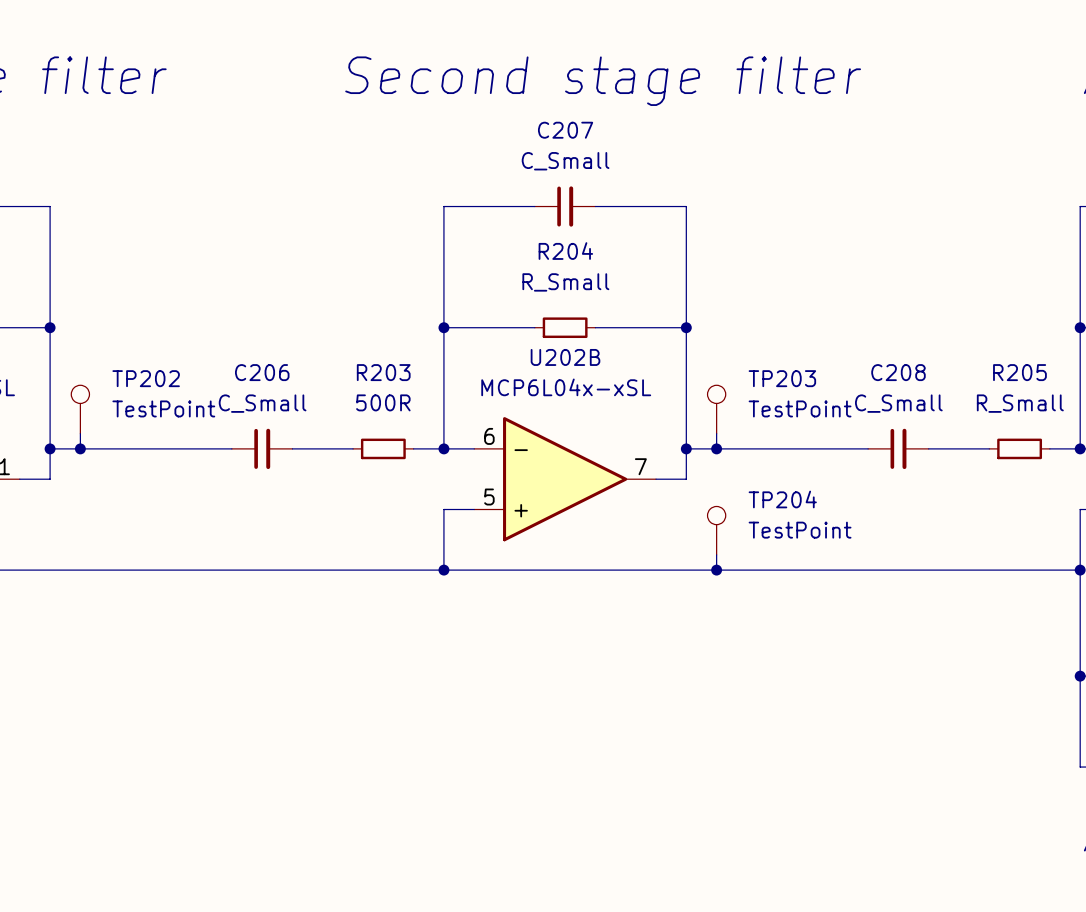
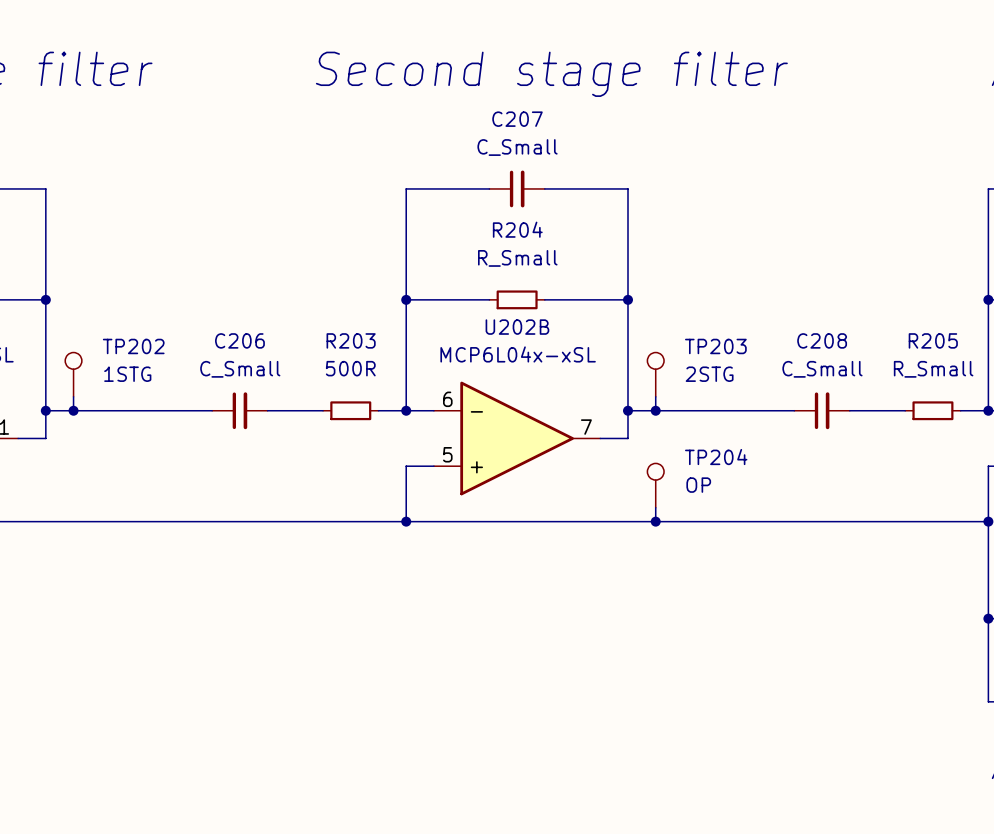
TP202 value: TestPoint (163, 408) -> 1STG (127, 374)
TP203 value: TestPoint (800, 408) -> 2STG (709, 374)
TP204 value: TestPoint (800, 530) -> OP (698, 485)

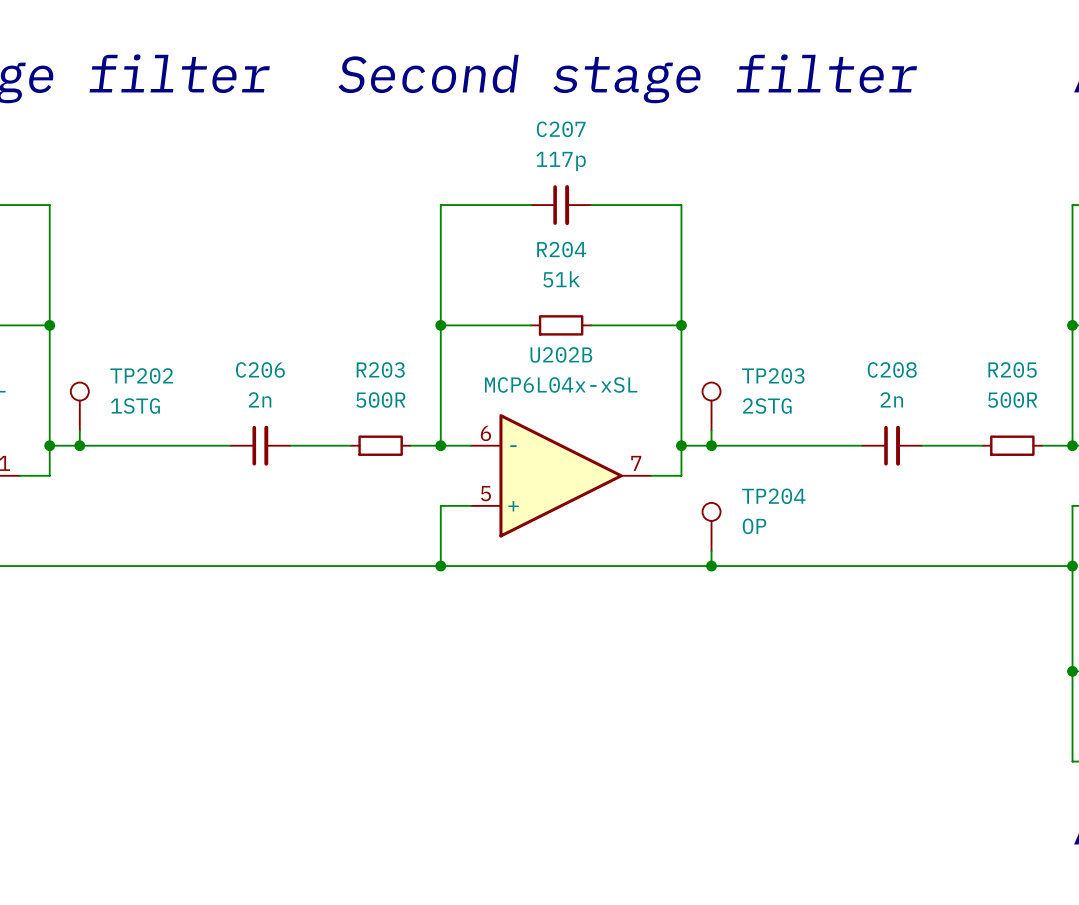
C207 value: C_Small (517, 147) -> 117p (561, 161)
R204 value: R_Small (517, 258) -> 51k (561, 279)
C206 value: C_Small (240, 369) -> 2n (260, 399)
C208 value: C_Small (822, 369) -> 2n (891, 399)
R205 value: R_Small (933, 369) -> 500R (1012, 400)

